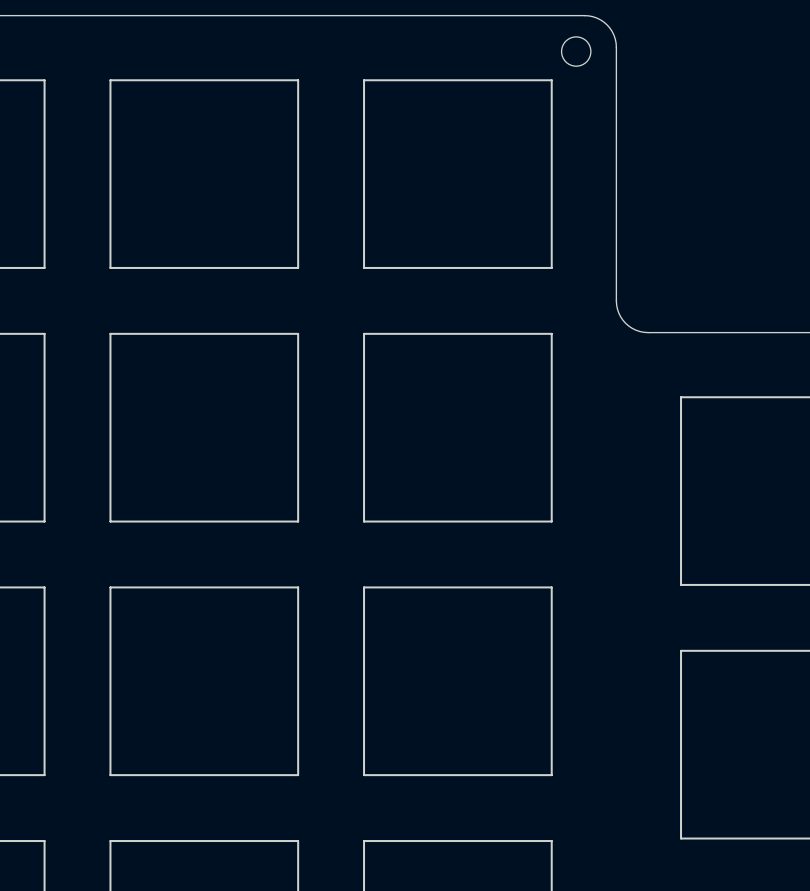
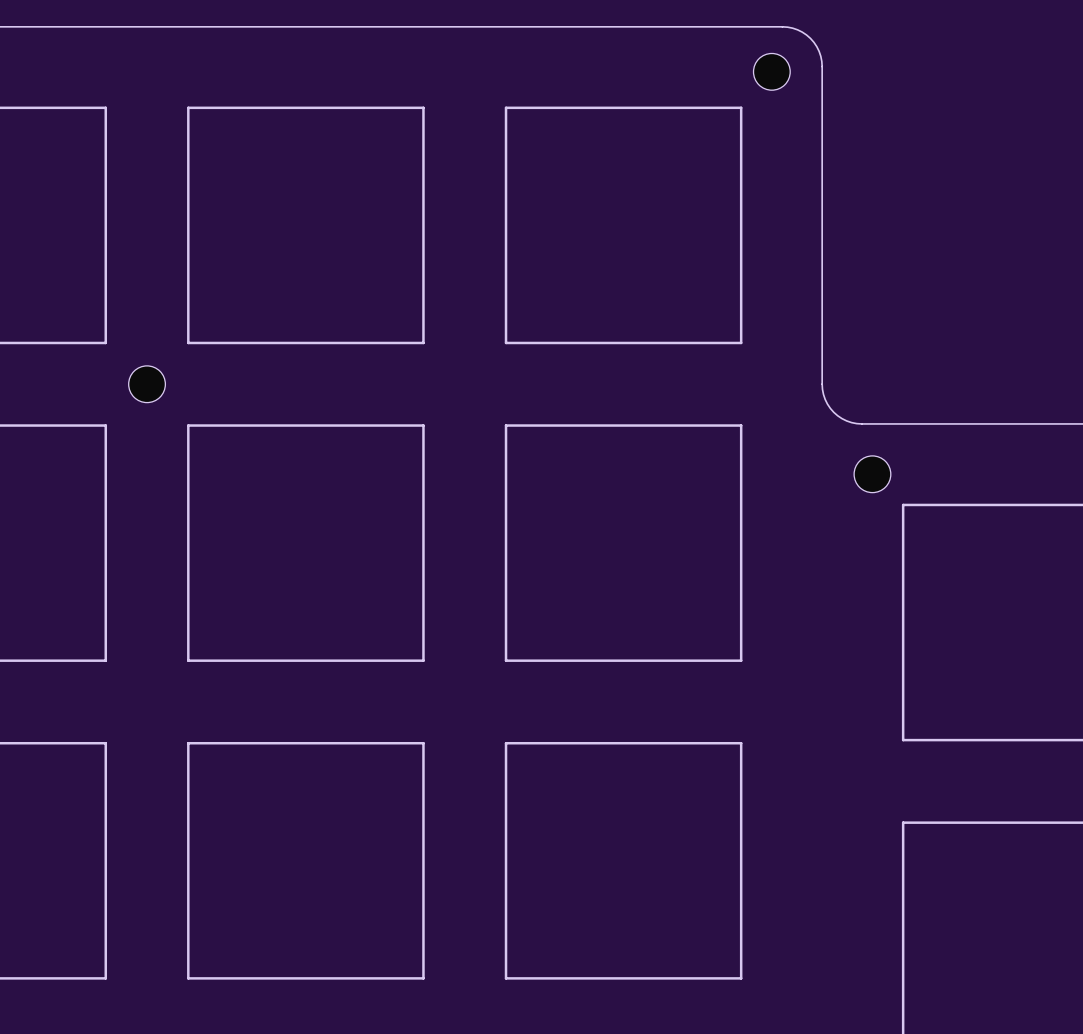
part: none -> (147, 384)
part: none -> (872, 474)

